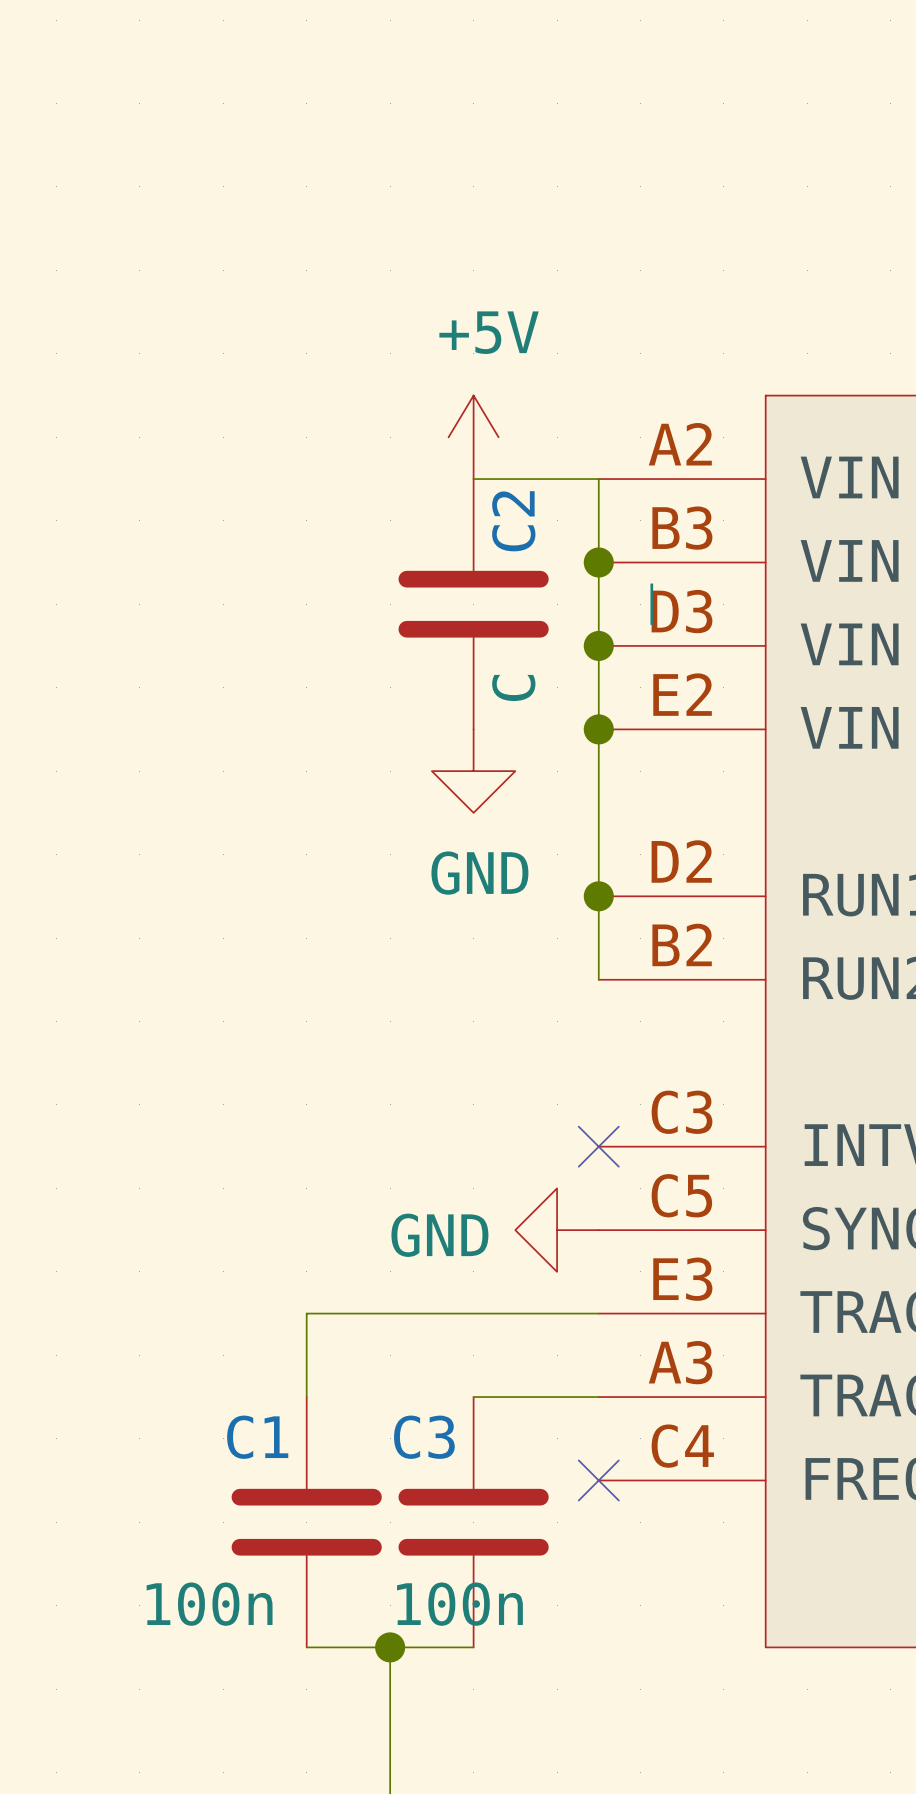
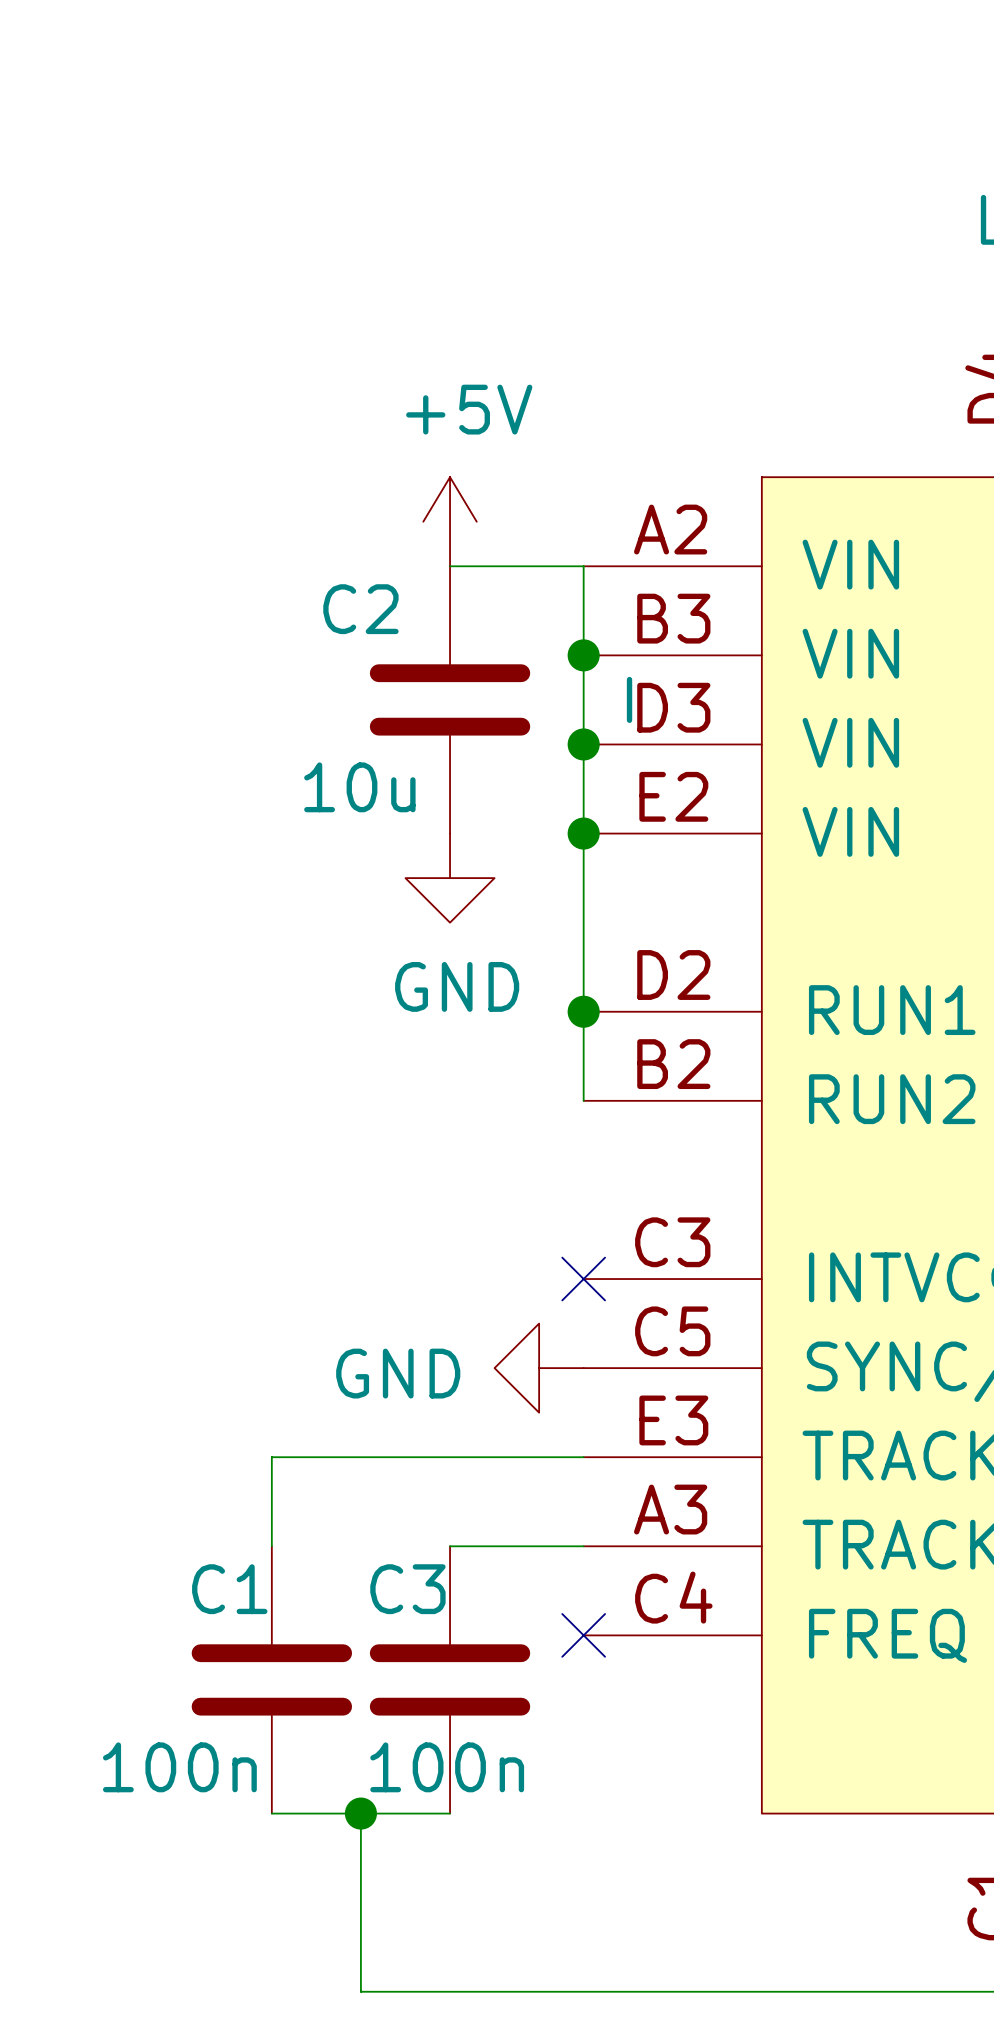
C2 name rotation: 0° (513, 521) -> 90° clockwise (360, 609)
C2 name position: C2 (513, 521) -> C2 (360, 609)
C2 value: C (513, 687) -> 10u (359, 787)

